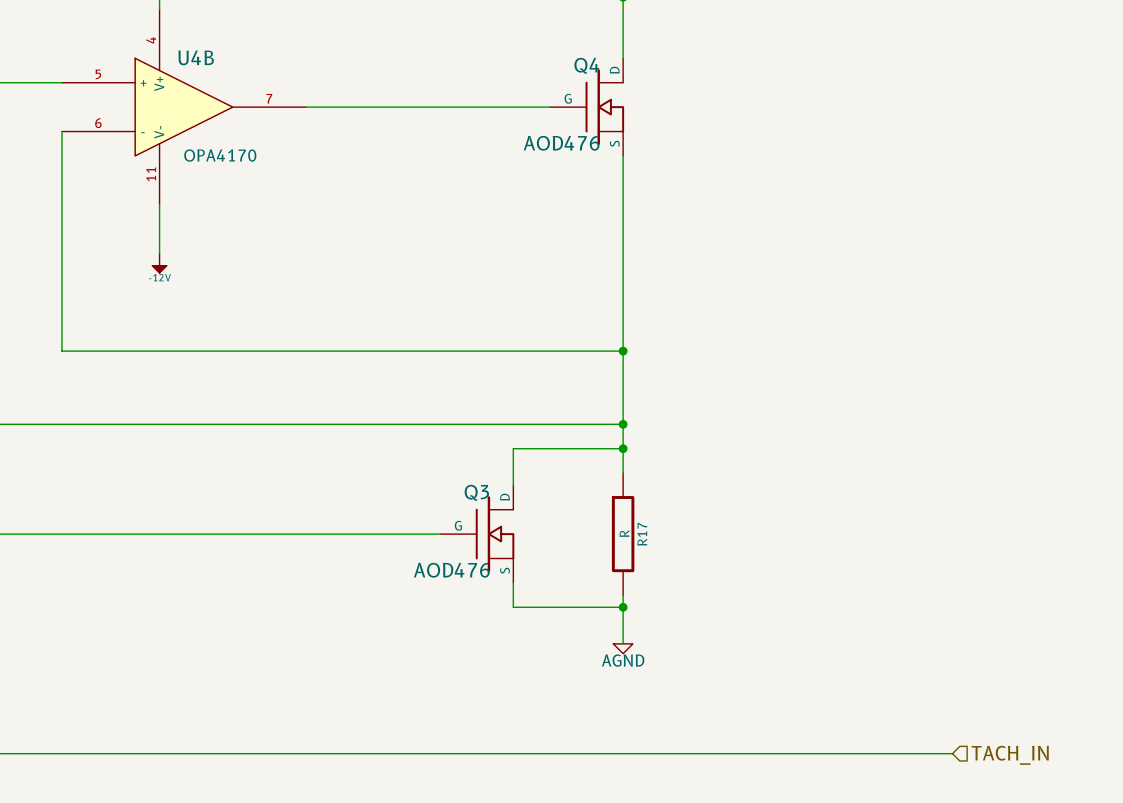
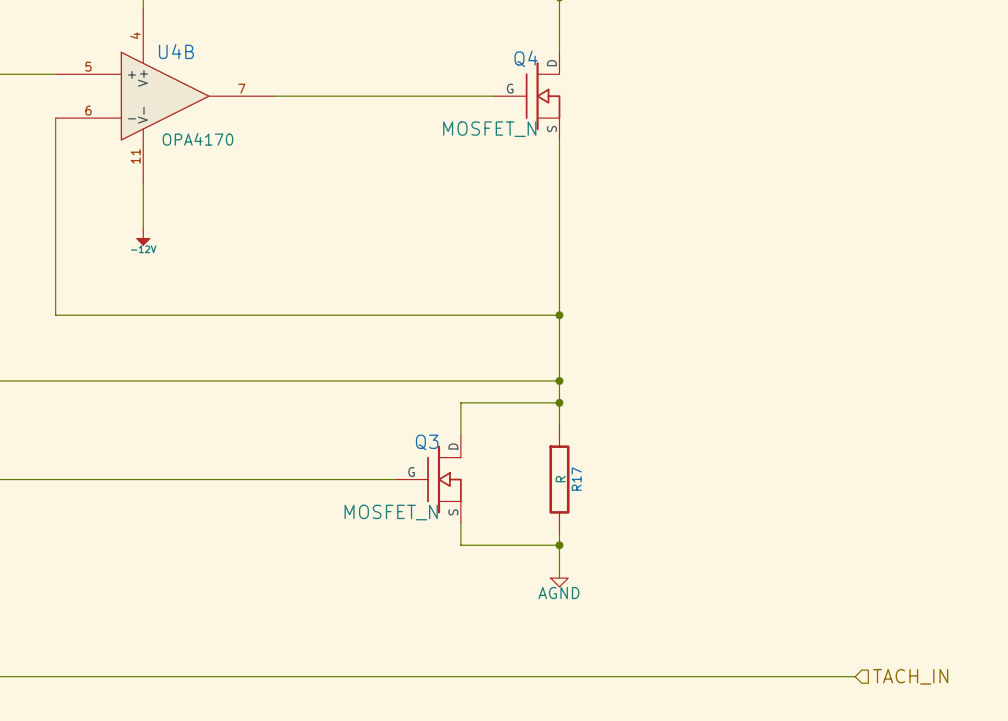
Q4 value: AOD476 (561, 143) -> MOSFET_N (489, 129)
Q3 value: AOD476 (451, 570) -> MOSFET_N (391, 512)

